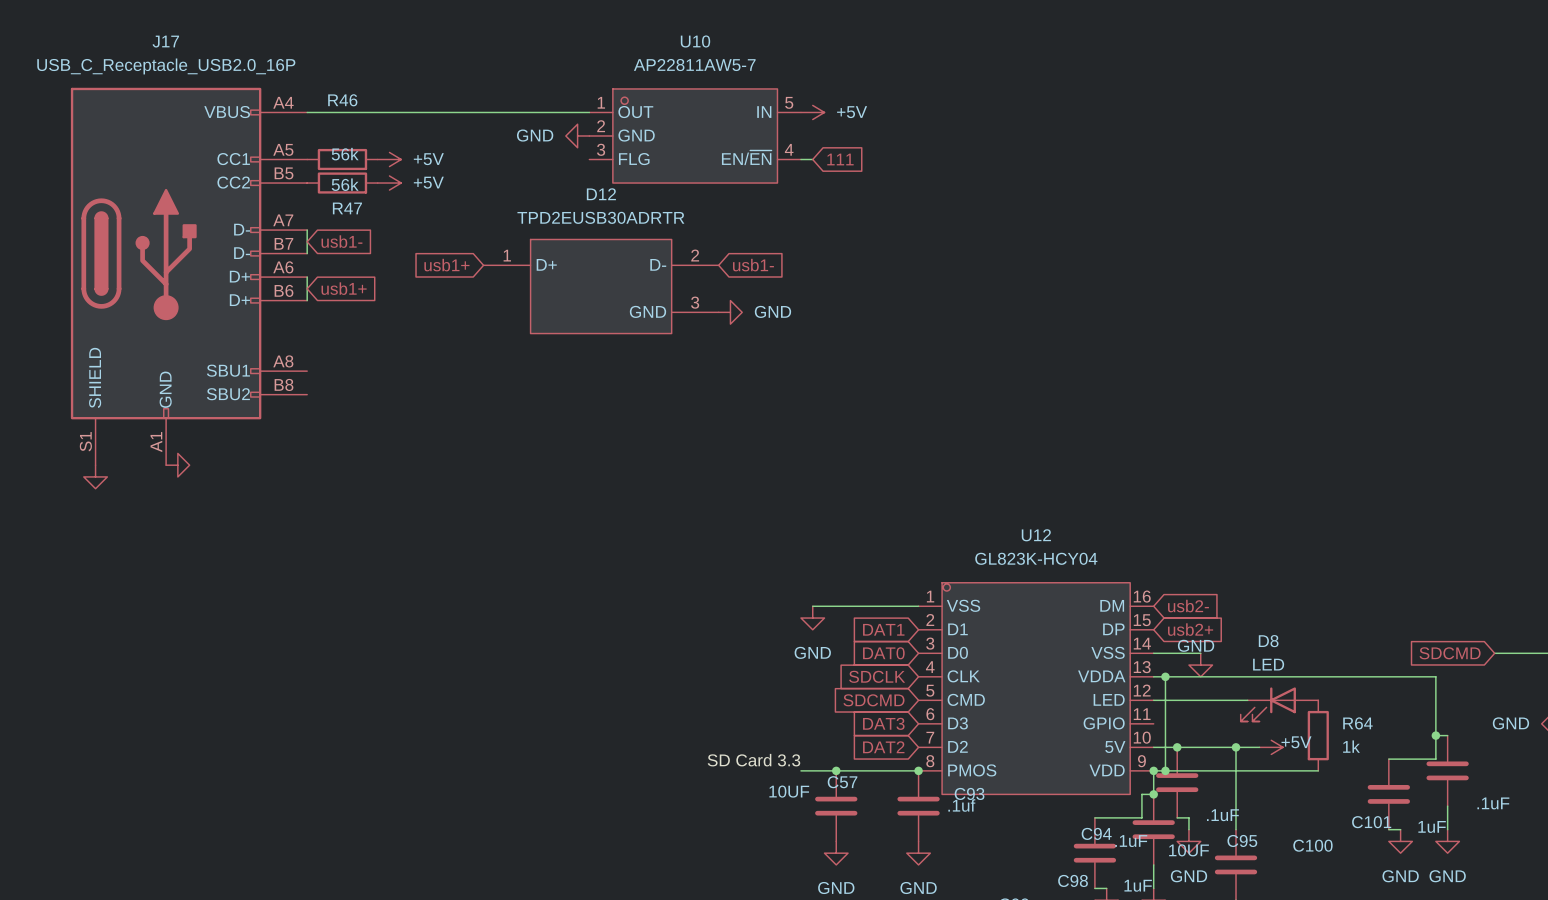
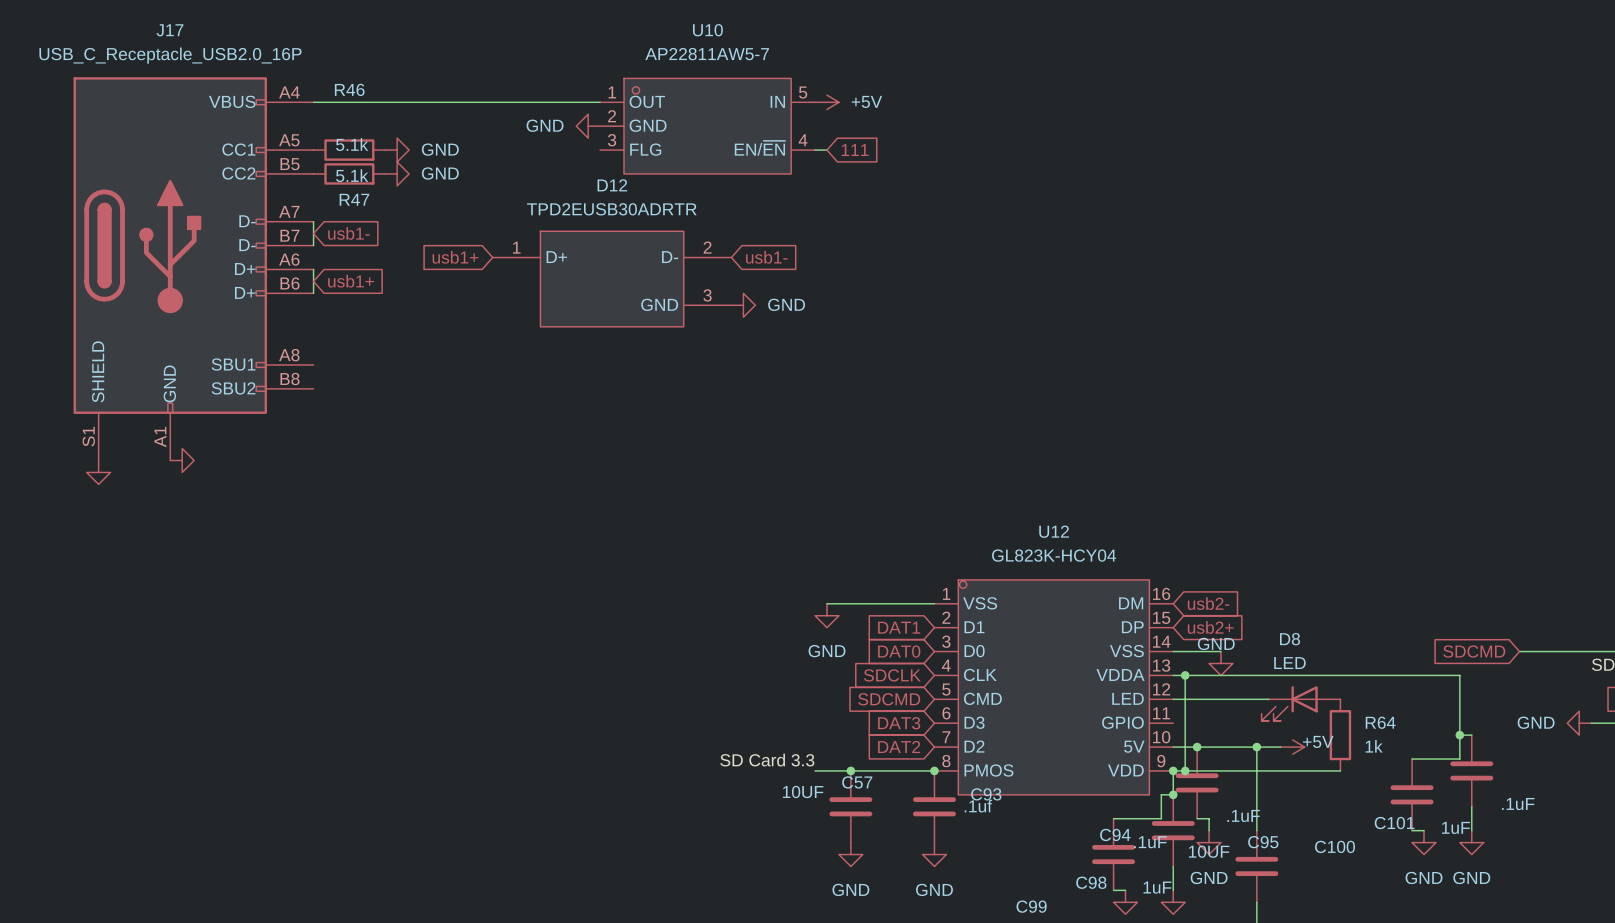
R46 value: 56k (345, 154) -> 5.1k (352, 144)
power symbol: +5V (389, 159) -> GND (397, 150)
power symbol: +5V (389, 183) -> GND (397, 173)
R47 value: 56k (345, 184) -> 5.1k (352, 175)

